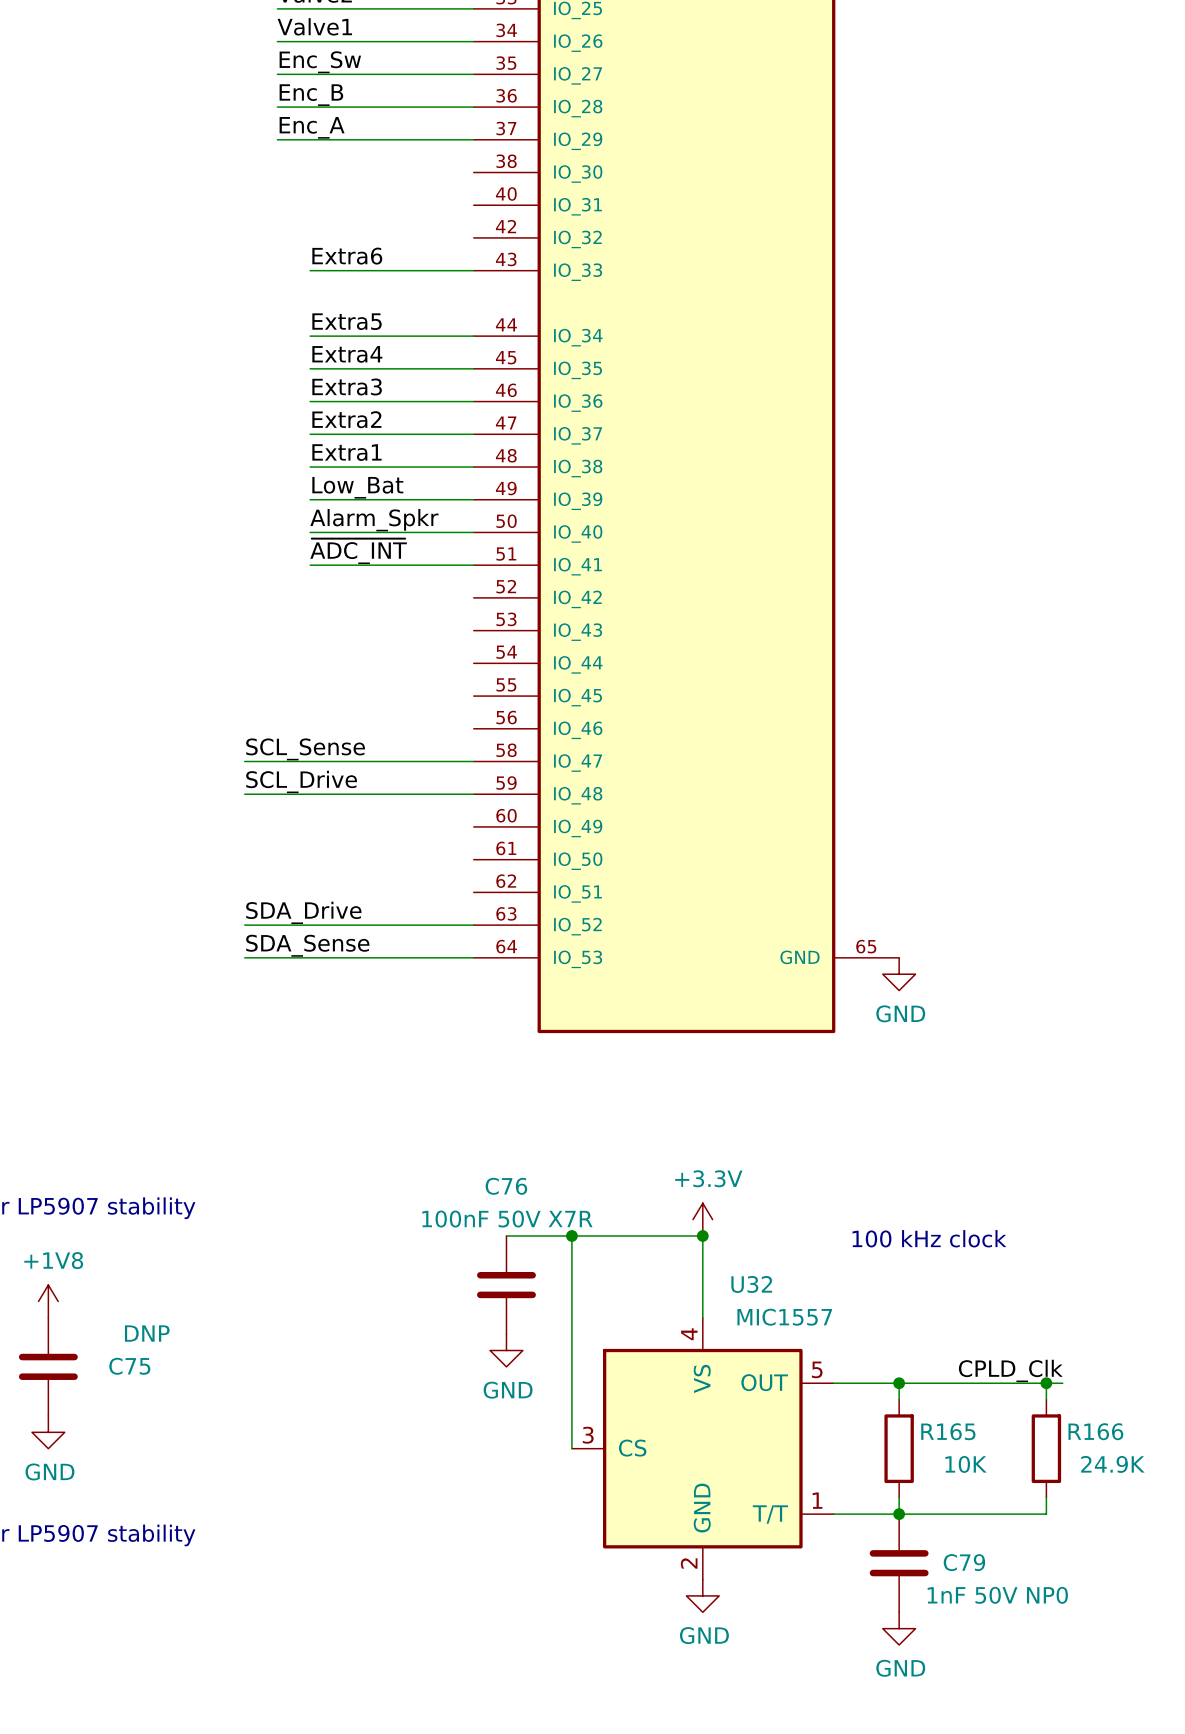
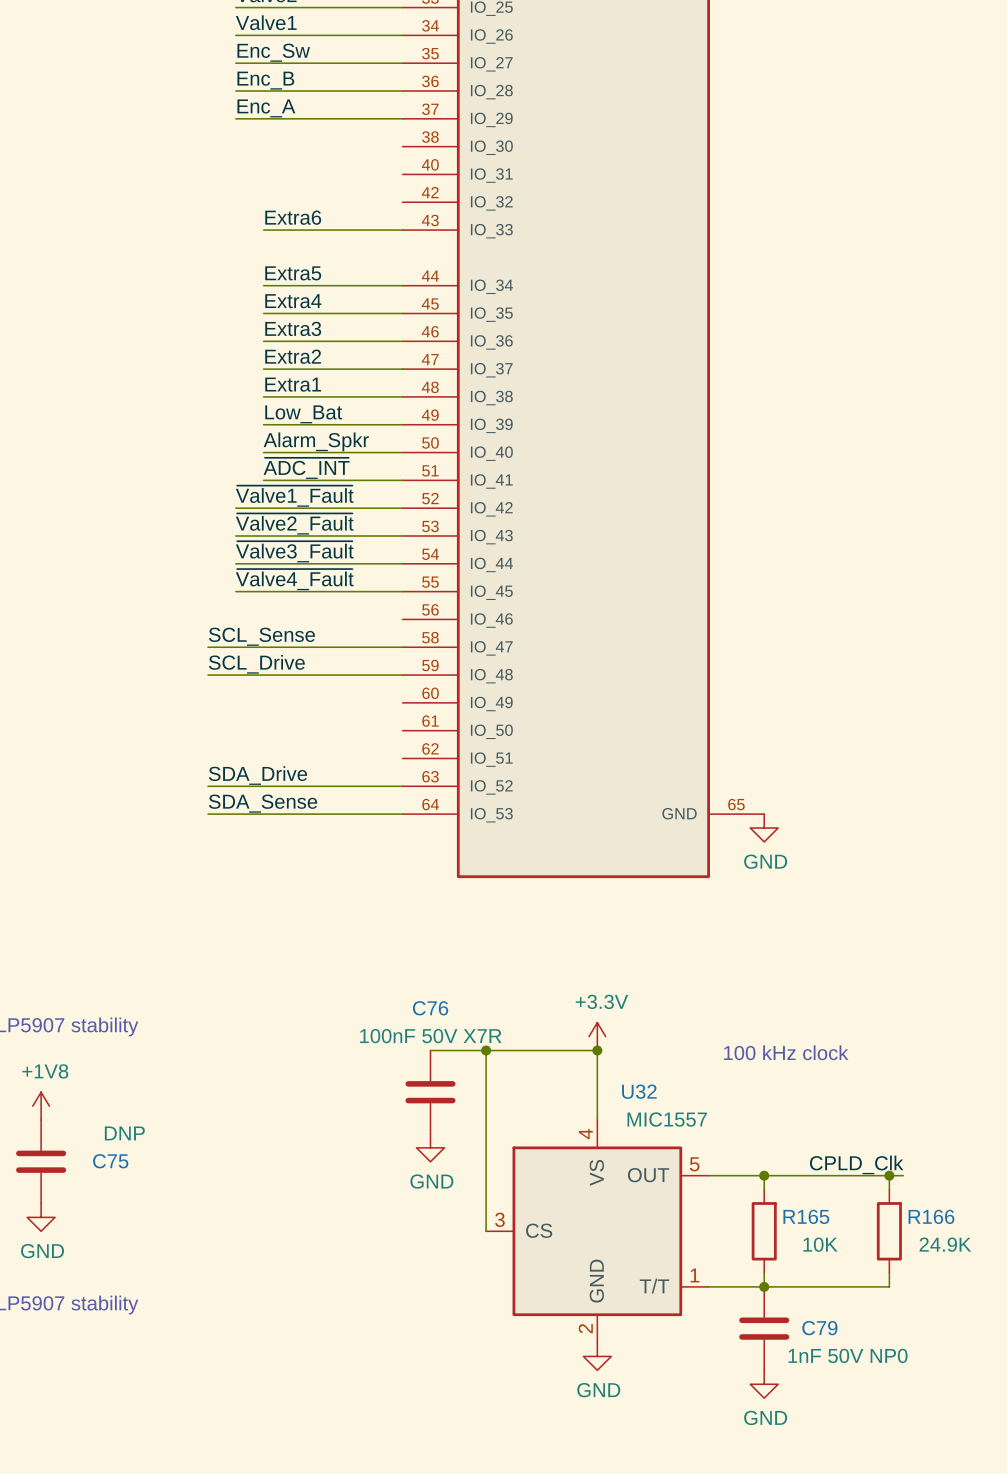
label: none -> ~{Valve1_Fault} (294, 496)
wire: none -> (235, 508) (402, 508)
label: none -> ~{Valve2_Fault} (294, 523)
wire: none -> (235, 535) (402, 535)
label: none -> ~{Valve3_Fault} (294, 551)
wire: none -> (235, 563) (402, 563)
label: none -> ~{Valve4_Fault} (294, 579)
wire: none -> (235, 591) (402, 591)

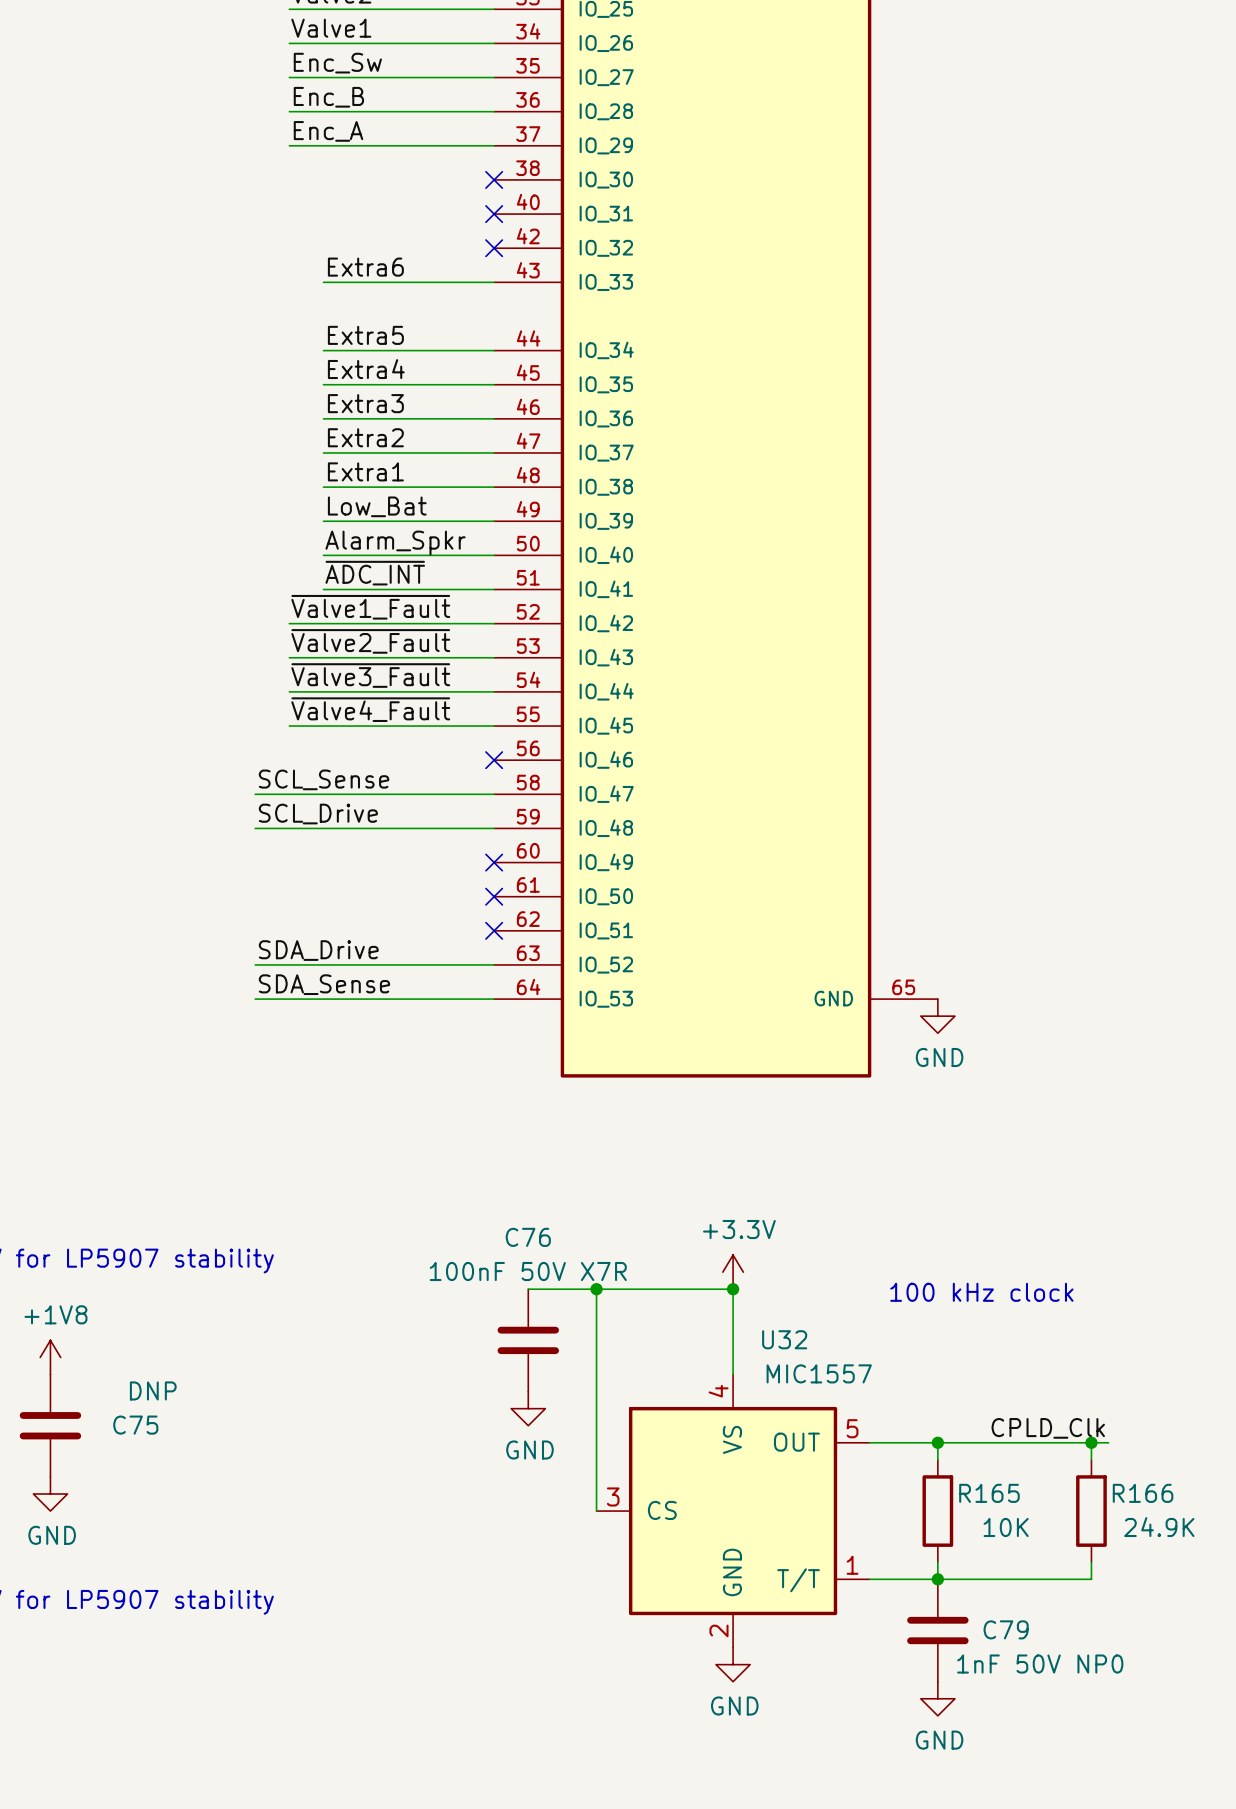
no-connect mark: none -> (494, 179)
no-connect mark: none -> (494, 214)
no-connect mark: none -> (494, 248)
no-connect mark: none -> (494, 760)
no-connect mark: none -> (494, 862)
no-connect mark: none -> (494, 896)
no-connect mark: none -> (494, 930)

